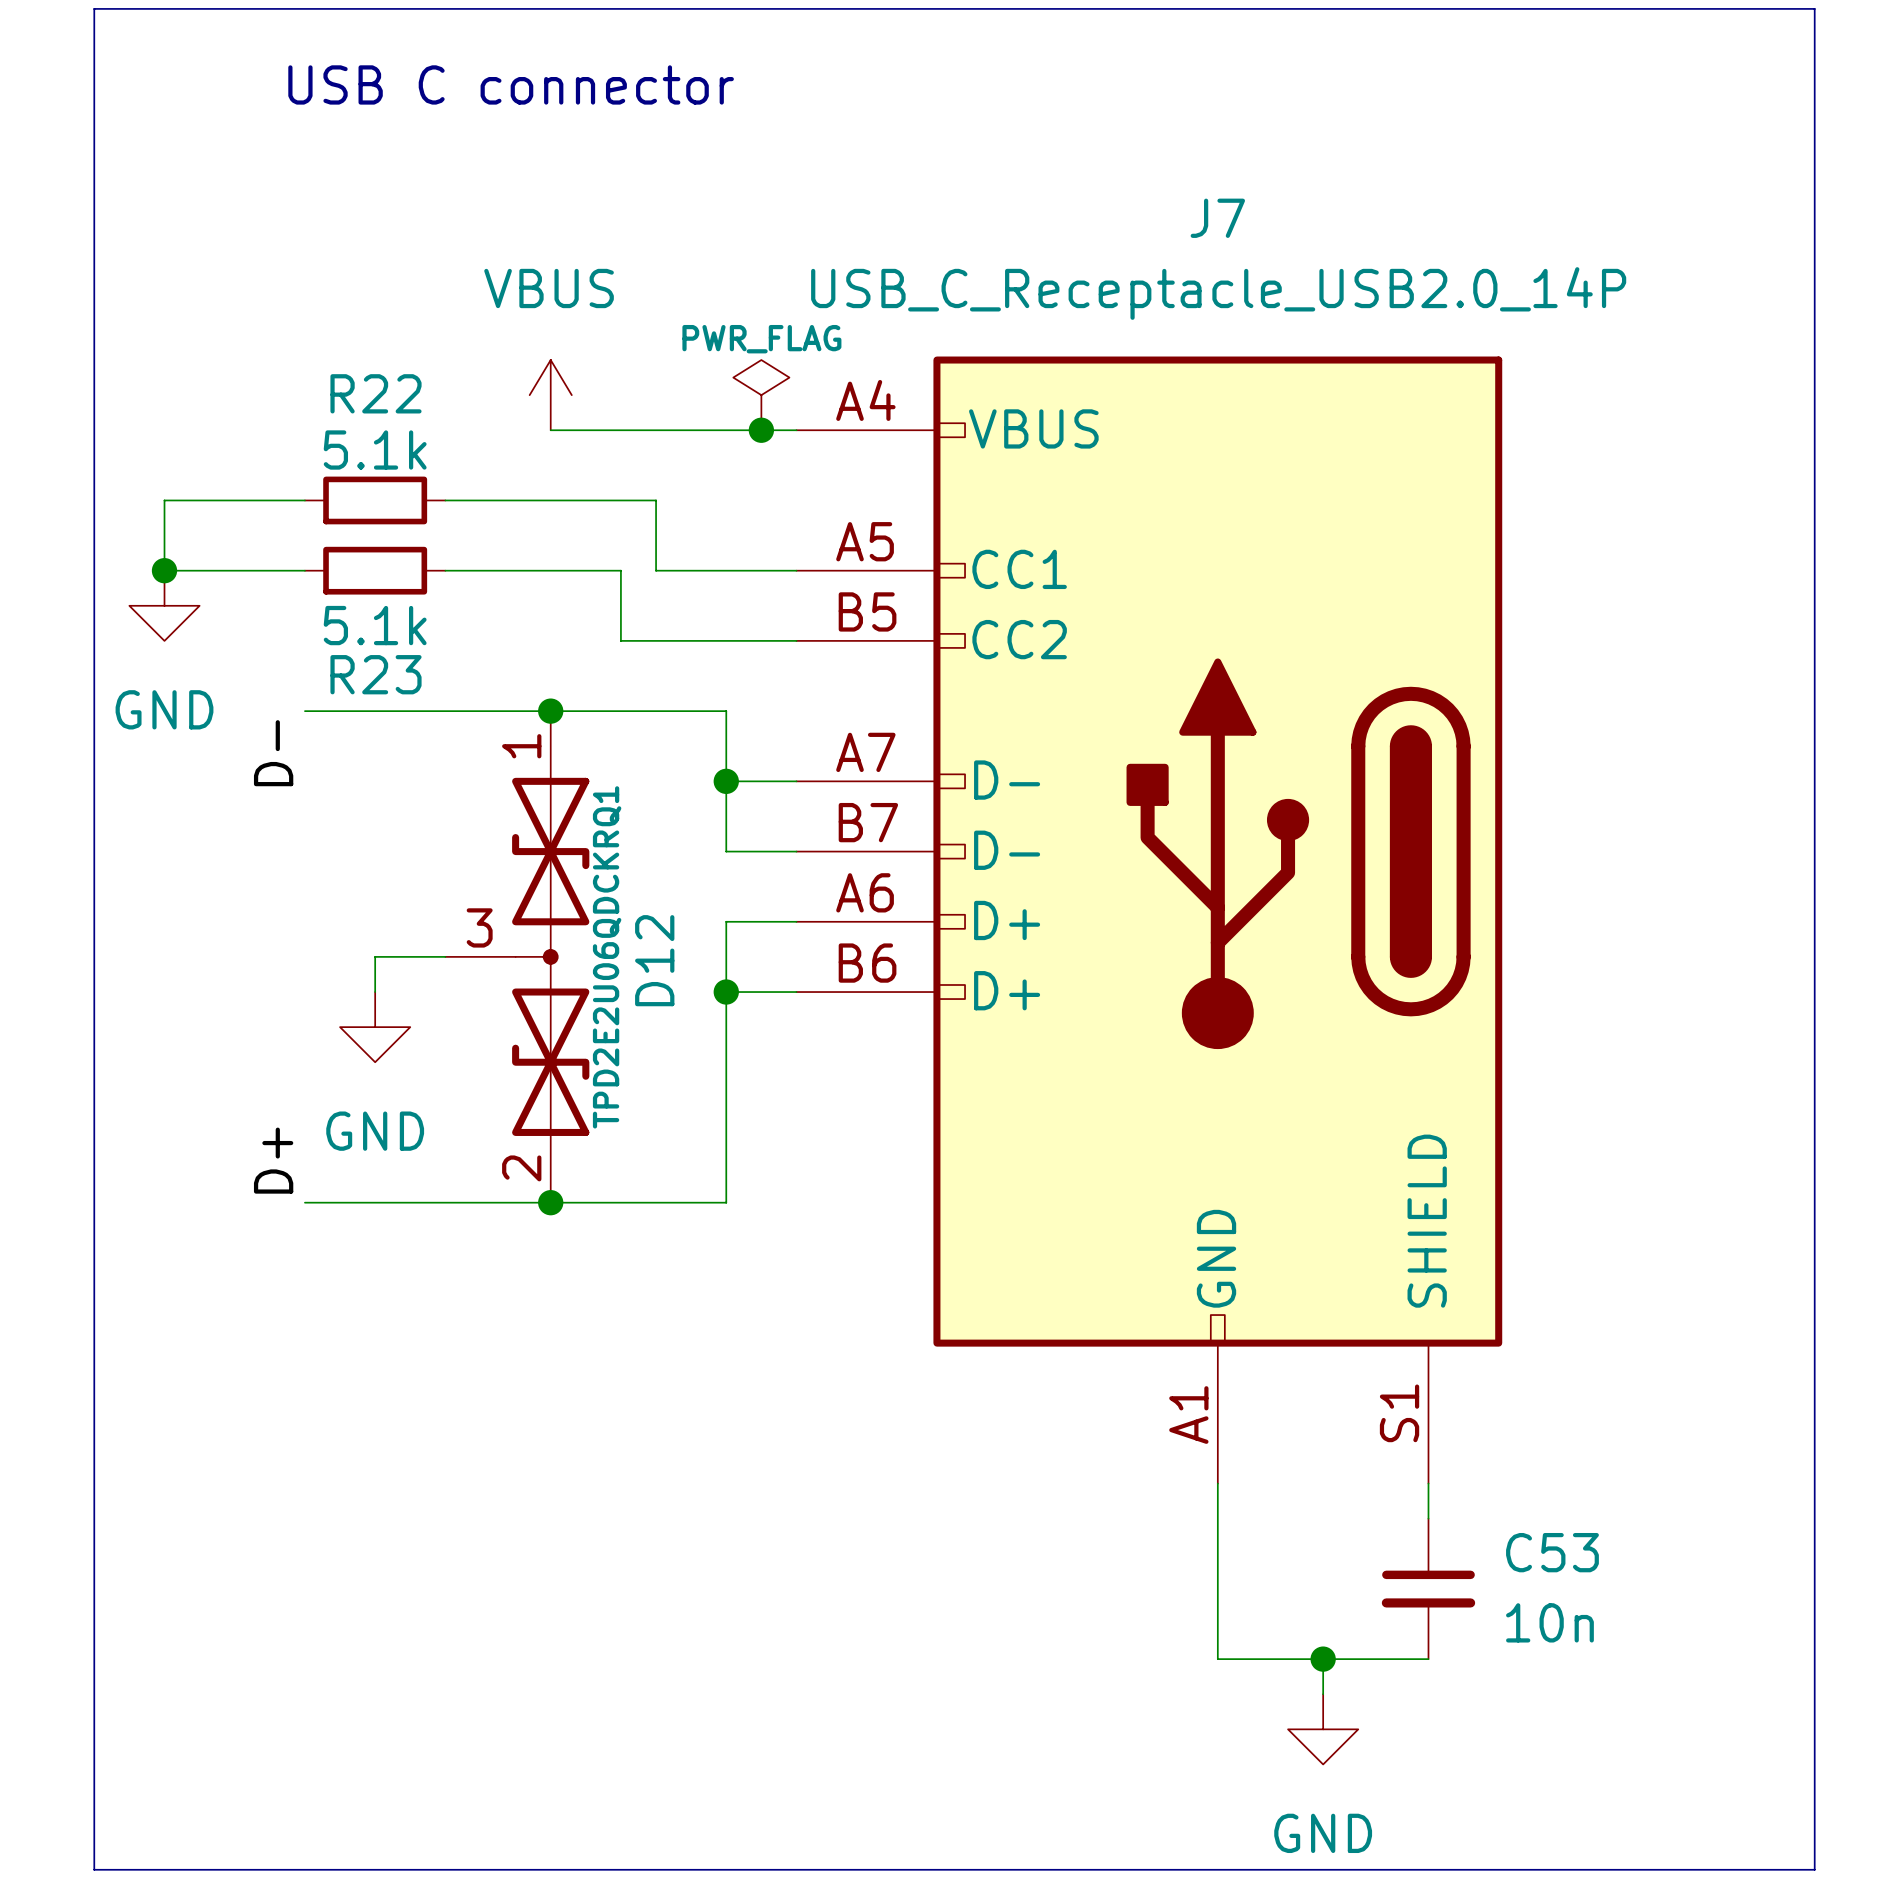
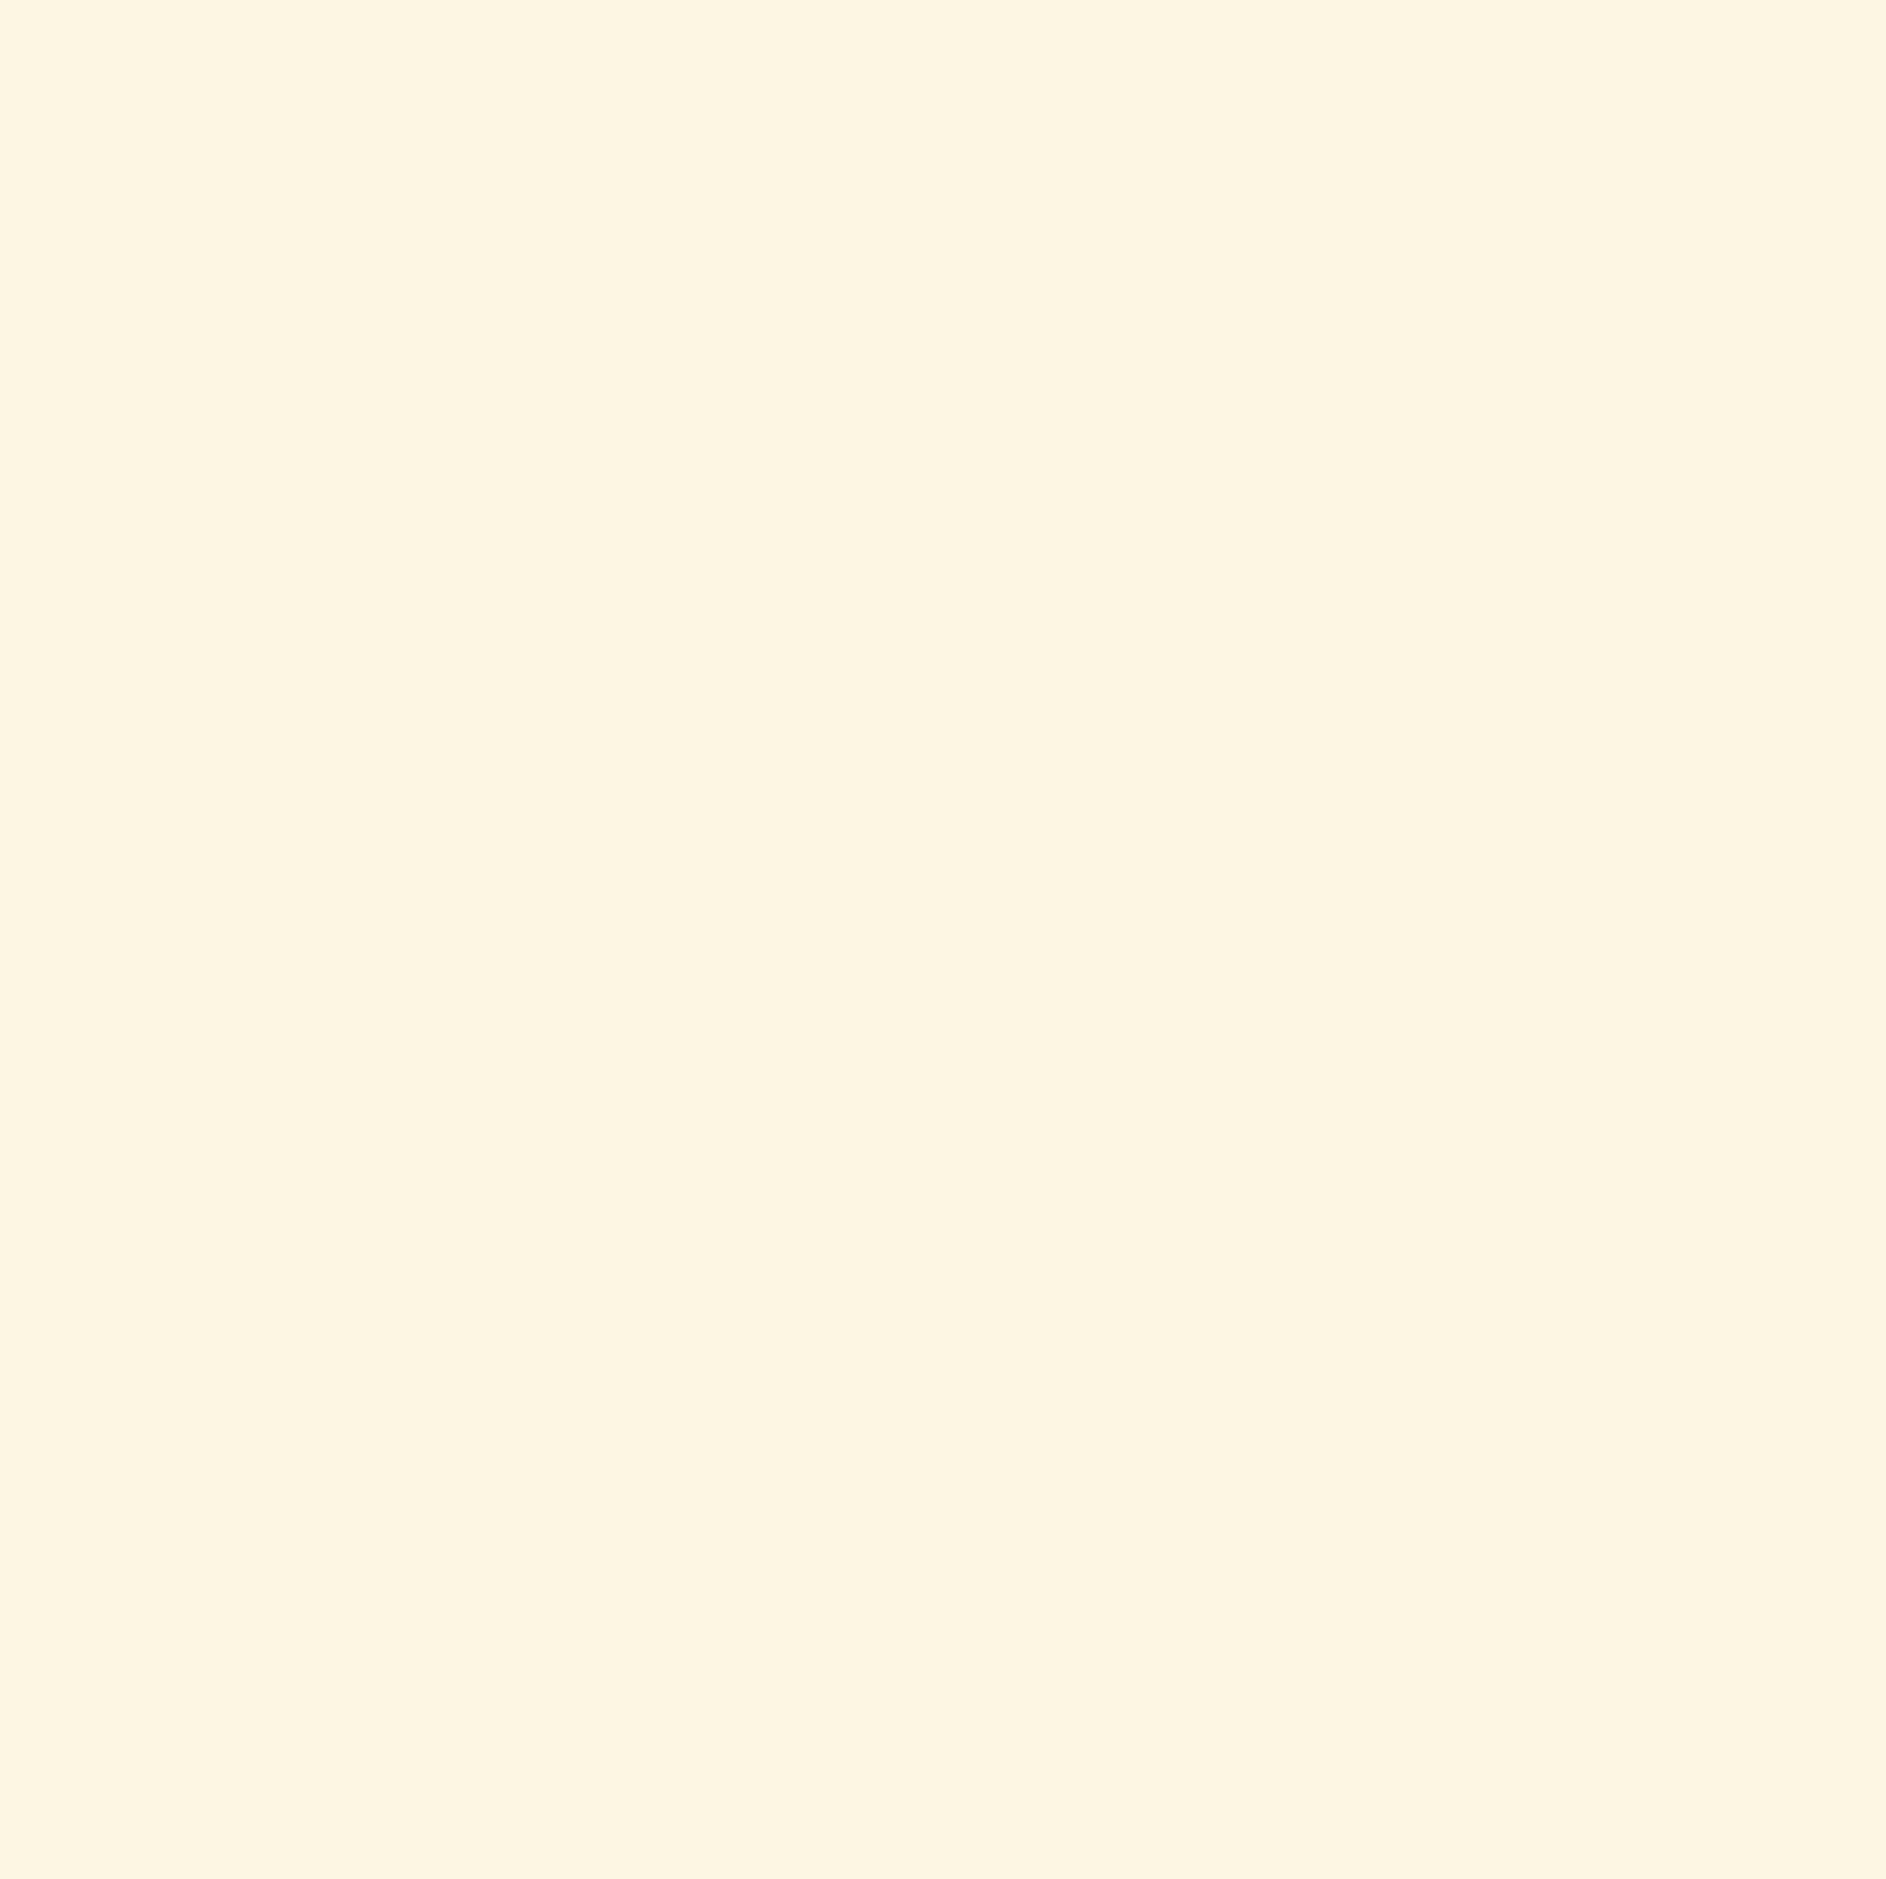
line: (94, 8) (1814, 8) (1814, 1869) (94, 1869) (94, 8) -> none
text: USB C connector (511, 84) -> none
power symbol: VBUS (550, 395) -> none
power symbol: PWR_FLAG (761, 395) -> none
wire: (550, 430) (796, 430) -> none
junction: (761, 430) -> none
wire: (304, 500) (164, 500) (164, 570) (304, 570) -> none
R22: 5.1k (375, 500) -> none
wire: (445, 500) (656, 500) (656, 570) (796, 570) -> none
junction: (164, 570) -> none
R23: 5.1k (375, 570) -> none
wire: (445, 570) (620, 570) (620, 640) (796, 640) -> none
power symbol: GND (164, 605) -> none
wire: (304, 711) (726, 711) (726, 851) (796, 851) -> none
junction: (550, 711) -> none
label: D- (273, 753) -> none
wire: (726, 781) (796, 781) -> none
junction: (726, 781) -> none
J7: USB_C_Receptacle_USB2.0_14P (1149, 920) -> none
wire: (796, 921) (726, 921) (726, 1202) (304, 1202) -> none
wire: (445, 956) (375, 956) (375, 992) -> none
D12: TPD2E2U06QDCKRQ1 (517, 956) -> none
wire: (726, 992) (796, 992) -> none
junction: (726, 992) -> none
power symbol: GND (375, 1027) -> none
label: D+ (273, 1160) -> none
junction: (550, 1202) -> none
wire: (1217, 1483) (1217, 1659) (1428, 1659) -> none
wire: (1428, 1483) (1428, 1518) -> none
C53: 10n (1428, 1588) -> none
wire: (1323, 1659) (1323, 1694) -> none
junction: (1323, 1659) -> none
power symbol: GND (1323, 1729) -> none

